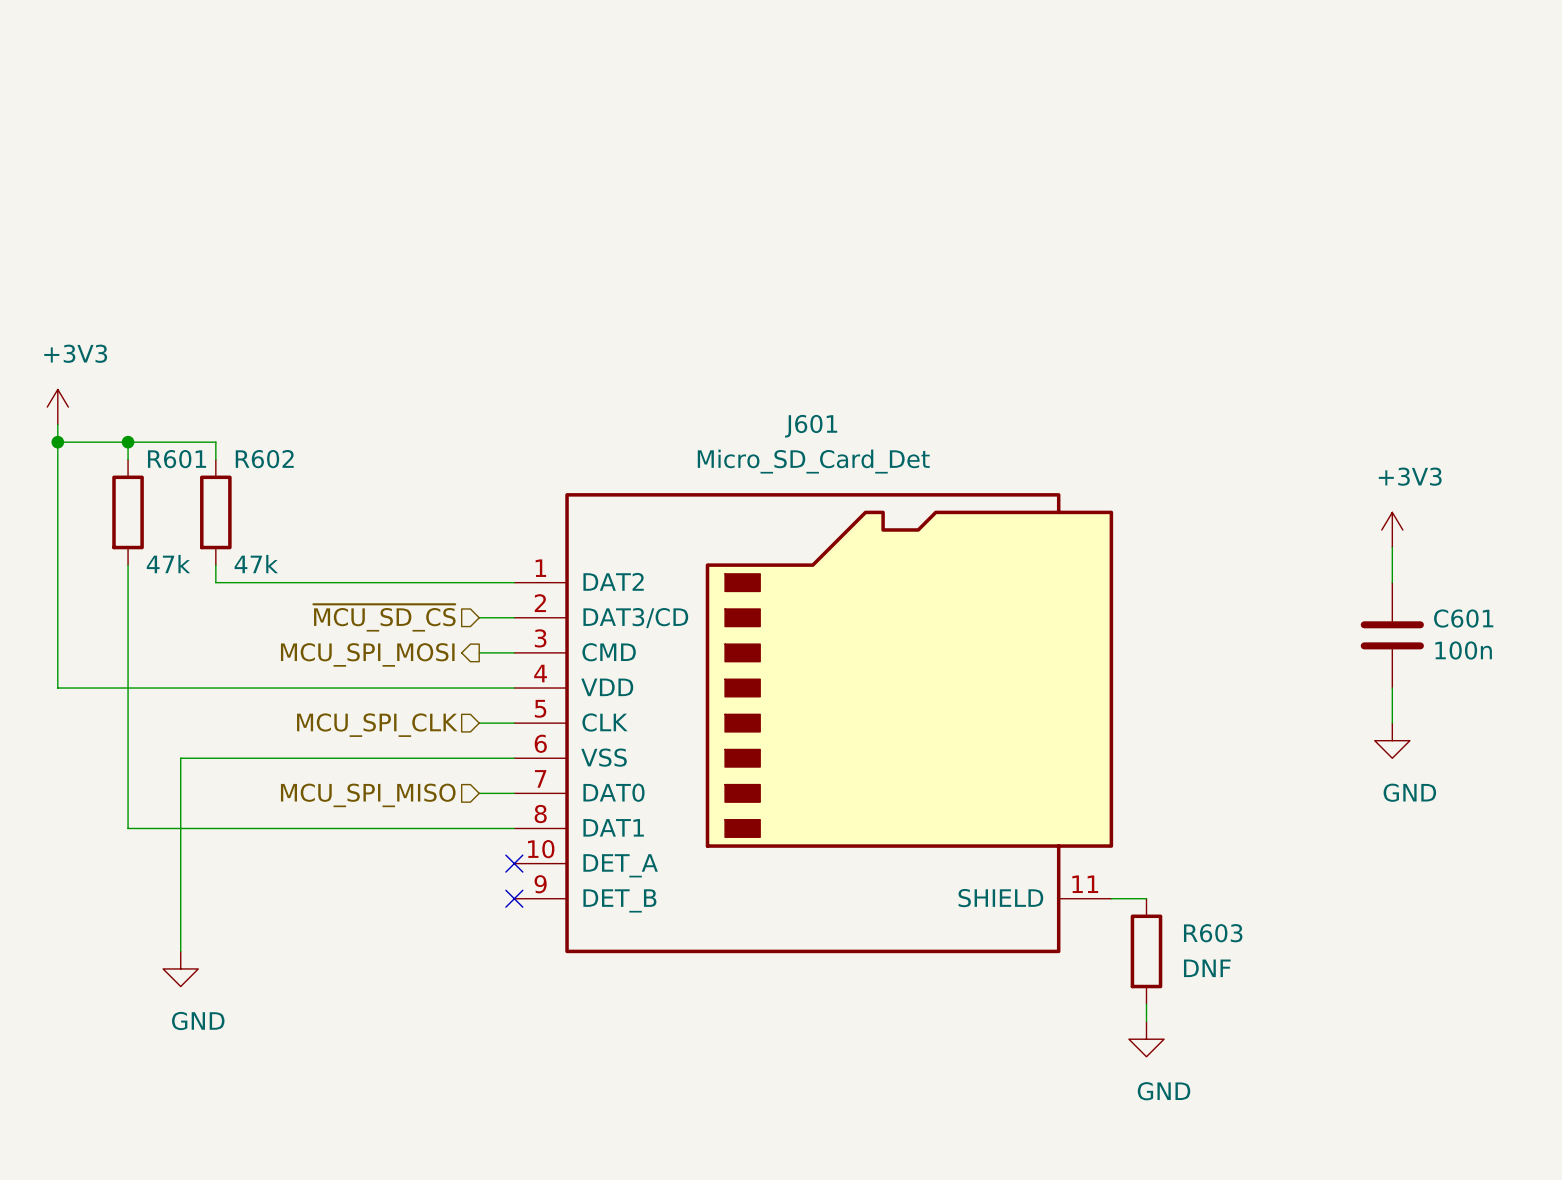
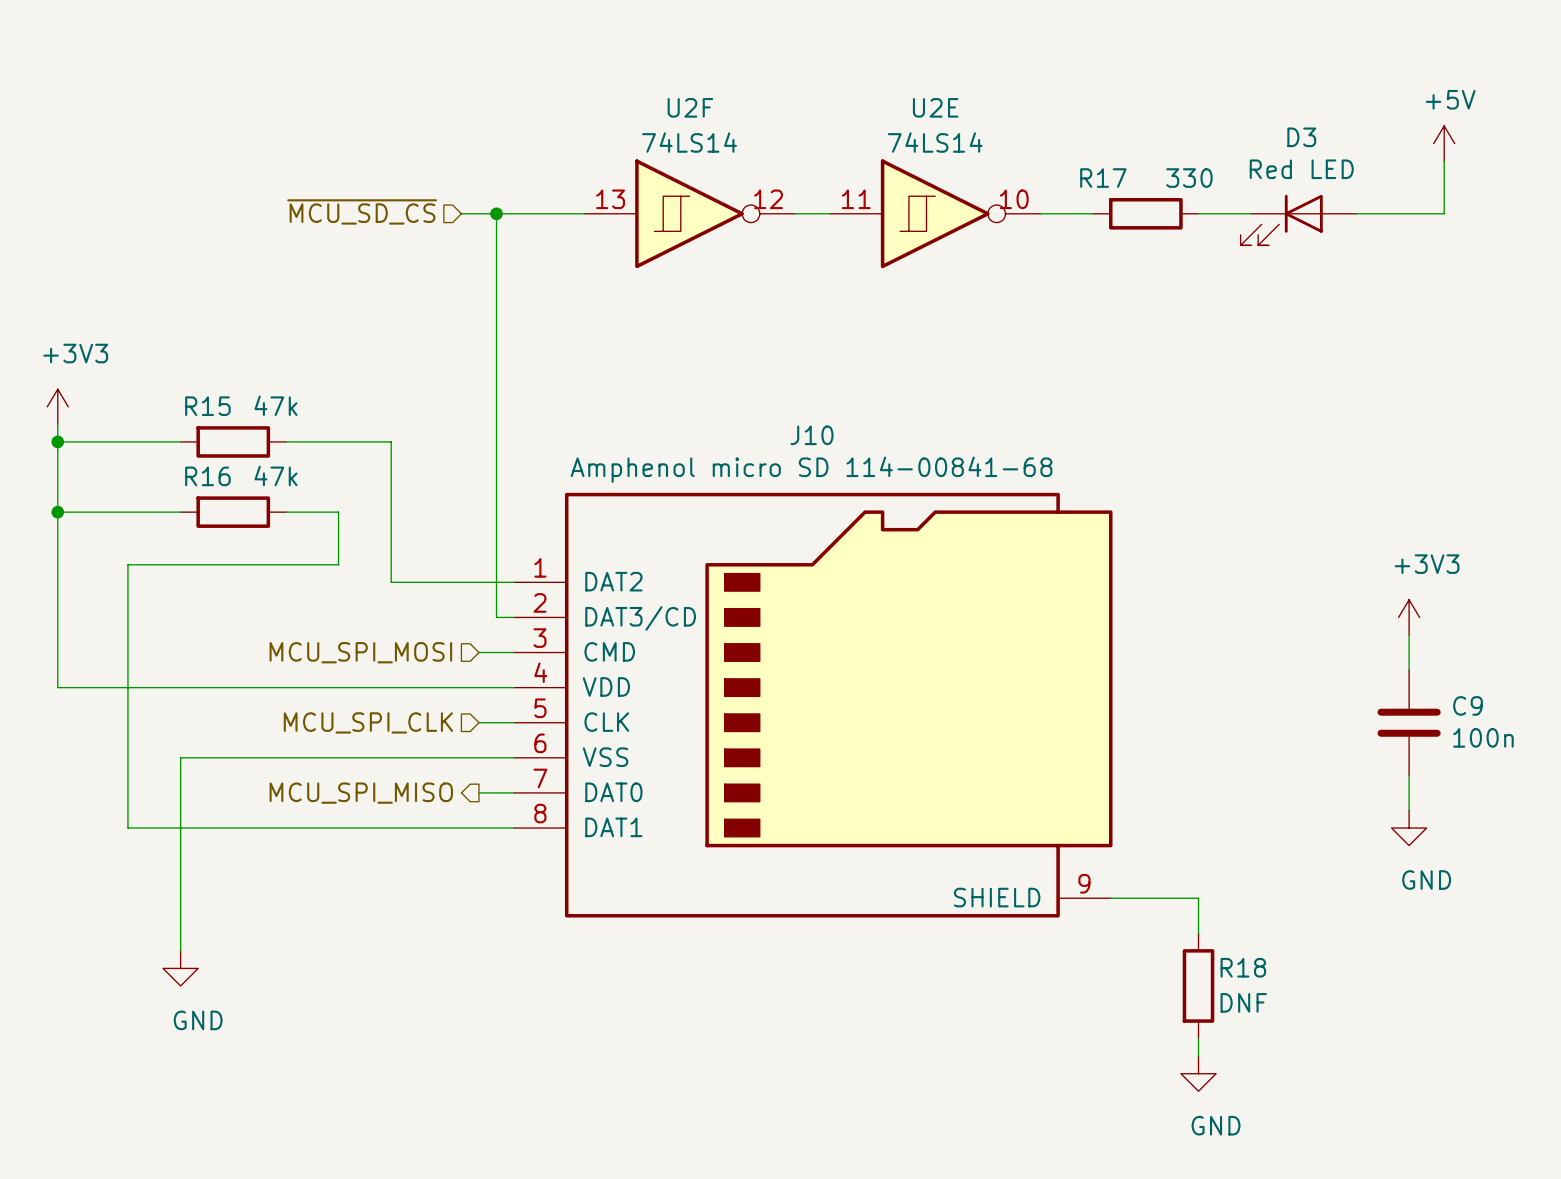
power symbol: none -> +5V (1444, 143)
wire: none -> (1444, 161) (1444, 213) (1356, 213)
wire: none -> (461, 213) (584, 213)
junction: none -> (496, 213)
U2F: none -> 74LS14 (689, 213)
wire: none -> (794, 213) (829, 213)
U2E: none -> 74LS14 (935, 213)
wire: none -> (1040, 213) (1093, 213)
R17: none -> 330 (1145, 213)
wire: none -> (1198, 213) (1251, 213)
hierarchical label: none -> ~{MCU_SD_CS} (362, 211)
D3: none -> Red LED (1298, 220)
wire: (128, 442) (128, 459) -> none
junction: (128, 442) -> none
wire: (180, 442) (215, 442) (215, 459) -> none
R15: none -> 47k (233, 441)
wire: none -> (57, 512) (180, 512)
junction: none -> (57, 512)
R601: 47k (128, 512) -> none
R602: 47k (215, 512) -> none
R16: none -> 47k (233, 512)
wire: none -> (285, 512) (338, 512) (338, 564) (127, 564)
power symbol position: +3V3 (1392, 529) -> +3V3 (1409, 617)
wire: (1392, 547) (1392, 582) -> (1409, 634) (1409, 670)
wire: (215, 565) (215, 582) (391, 582) -> (285, 441) (391, 441) (391, 582)
hierarchical label: ~{MCU_SD_CS} (384, 617) -> none
wire: (479, 617) (496, 617) -> (496, 213) (496, 617)
C601: 100n (1392, 635) -> none
hierarchical label shape: output (367, 654) -> input (360, 652)
wire: (1392, 688) (1392, 723) -> (1409, 775) (1409, 810)
J10: none -> Amphenol micro SD 114-00841-68 (813, 705)
J601: Micro_SD_Card_Det (813, 723) -> none
C9: none -> 100n (1409, 722)
power symbol position: GND (1392, 740) -> GND (1409, 828)
hierarchical label shape: input (368, 795) -> output (361, 793)
no-connect mark: (514, 863) -> none
no-connect mark: (514, 898) -> none
wire: none -> (1145, 898) (1198, 898) (1198, 933)
R603: DNF (1146, 951) -> none
R18: none -> DNF (1198, 985)
wire: (1146, 1004) (1146, 1021) -> (1198, 1038) (1198, 1056)
power symbol position: GND (1146, 1039) -> GND (1198, 1073)

